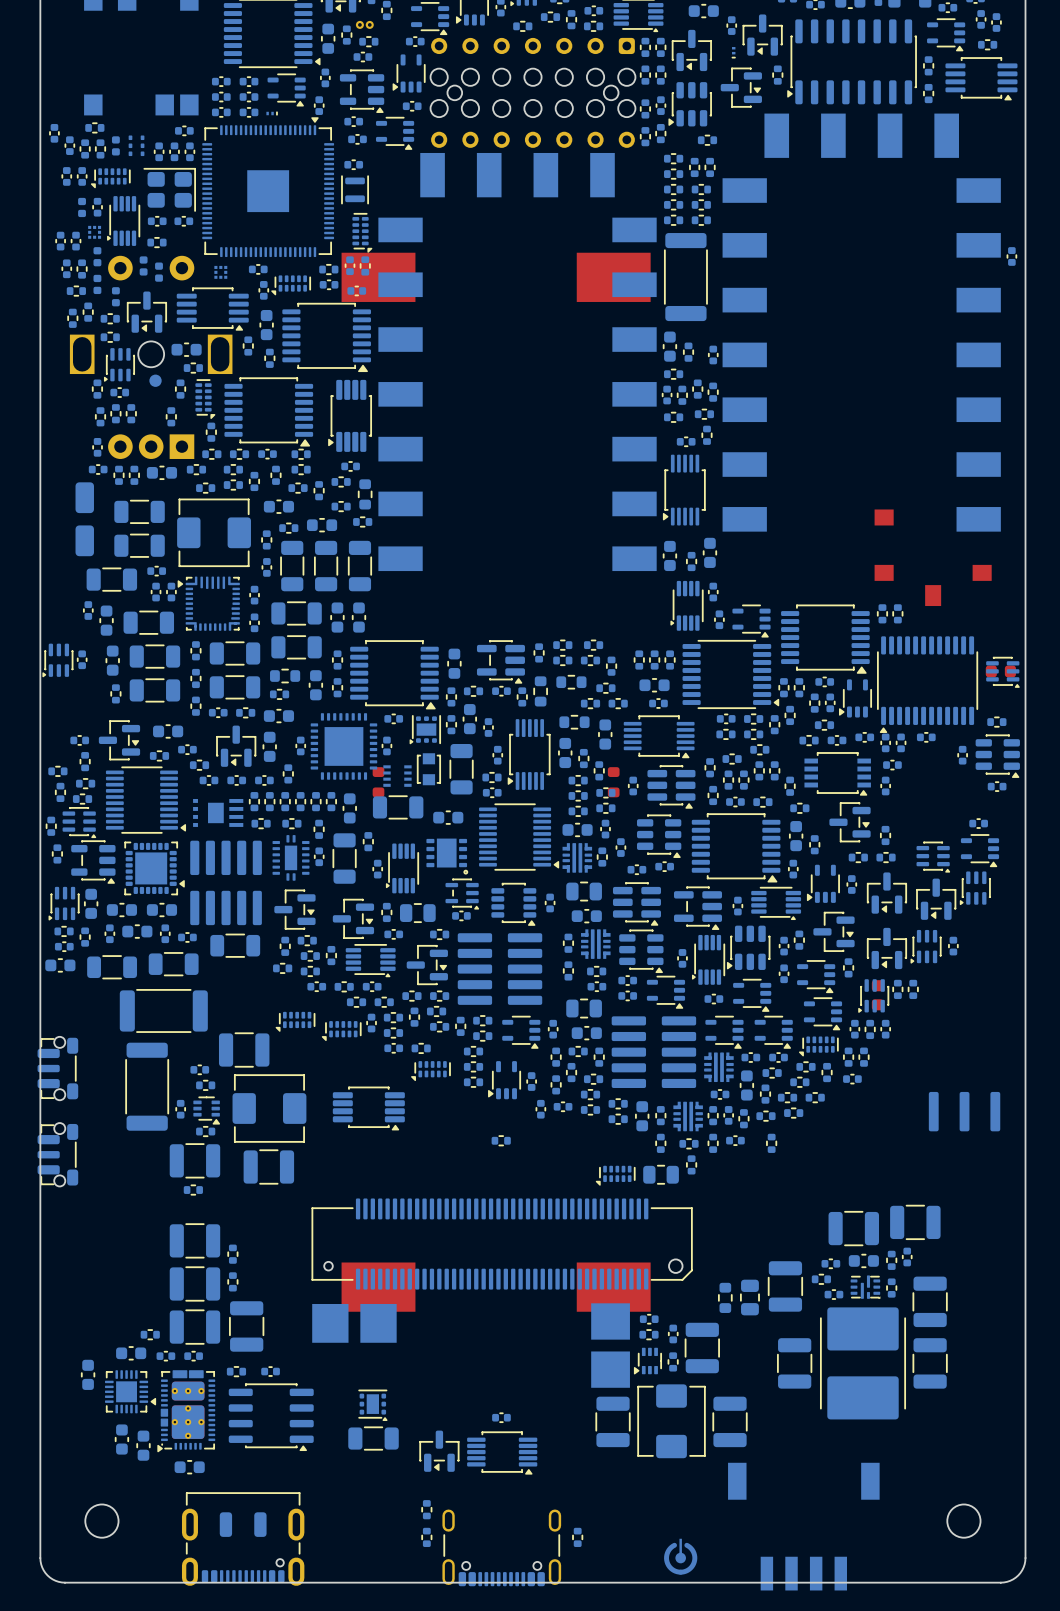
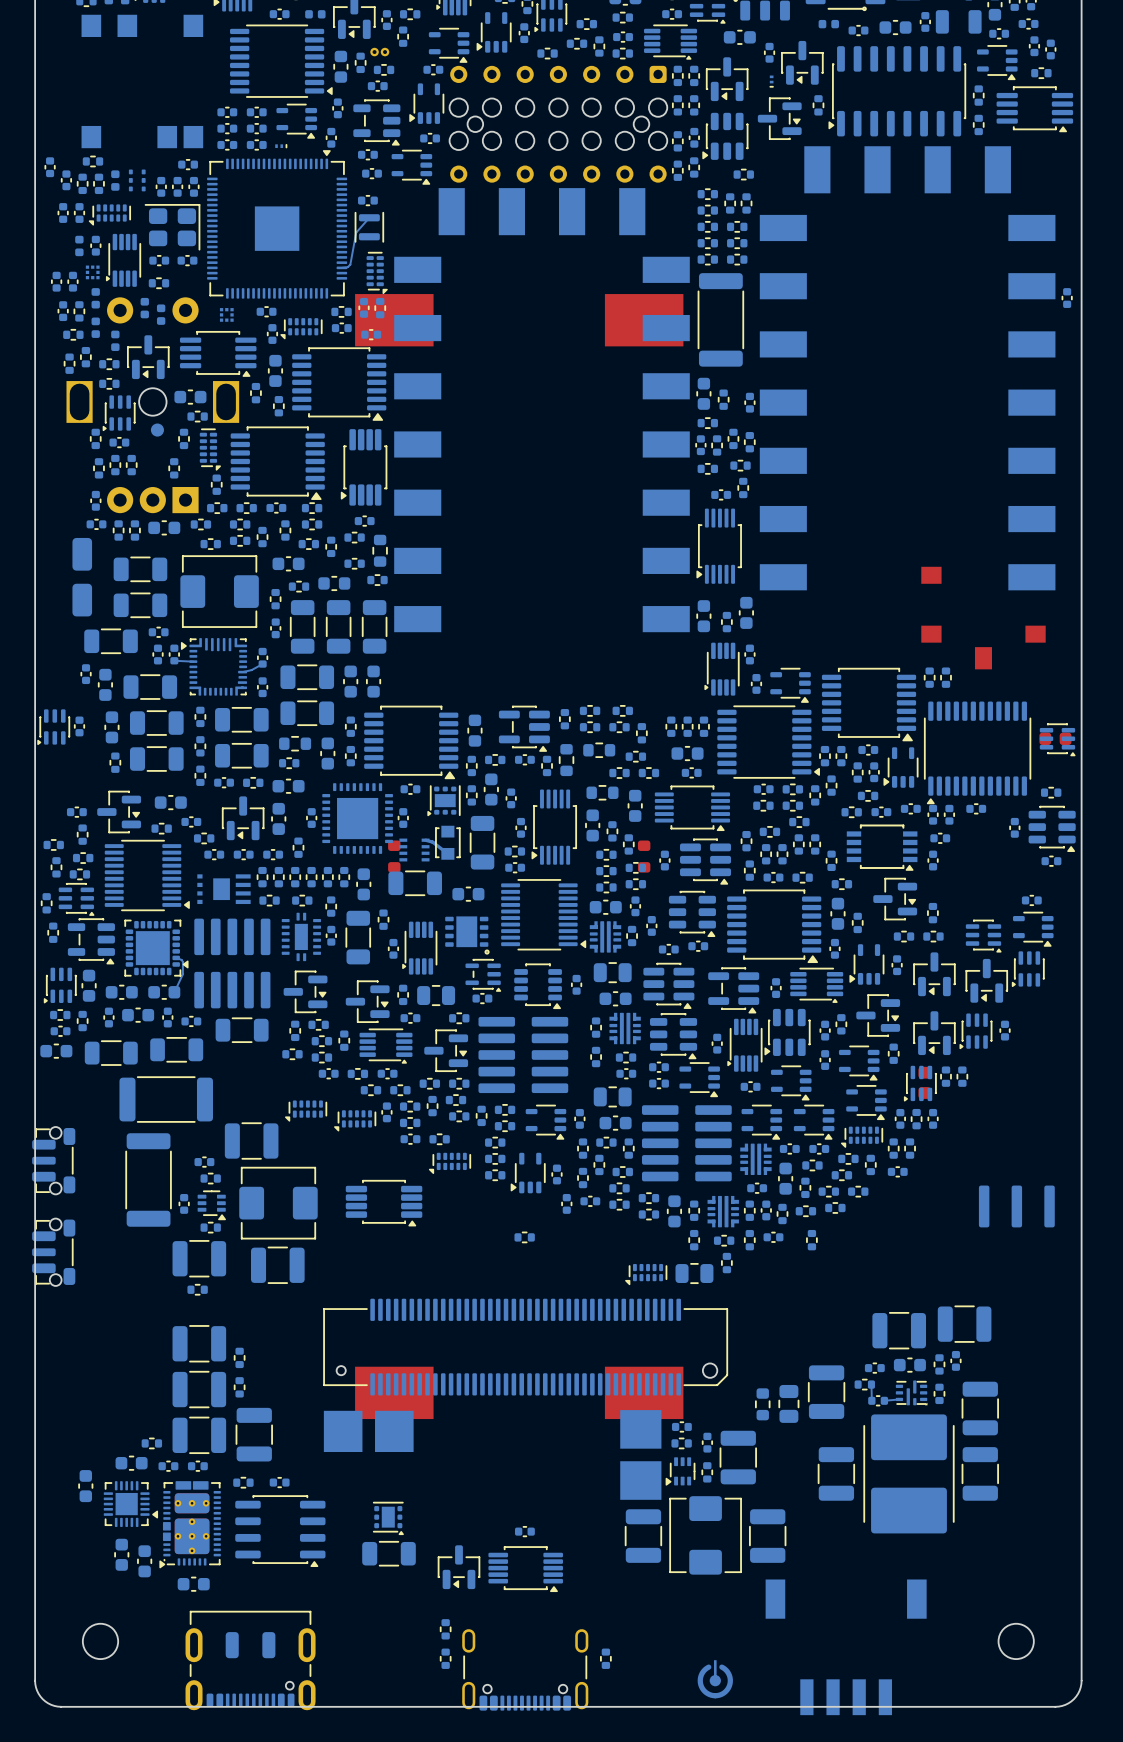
bottom track: none -> (369, 217) (356, 232) (350, 264) (347, 267) (341, 267)
bottom track: none -> (174, 660) (193, 661)
bottom track: none -> (262, 664) (251, 670) (242, 672)
bottom track: none -> (425, 840) (432, 842) (447, 853)
bottom track: none -> (176, 957) (182, 961) (182, 974) (174, 992)
bottom track: none -> (871, 1384) (871, 1400)
bottom track: none -> (899, 1399) (884, 1400)

